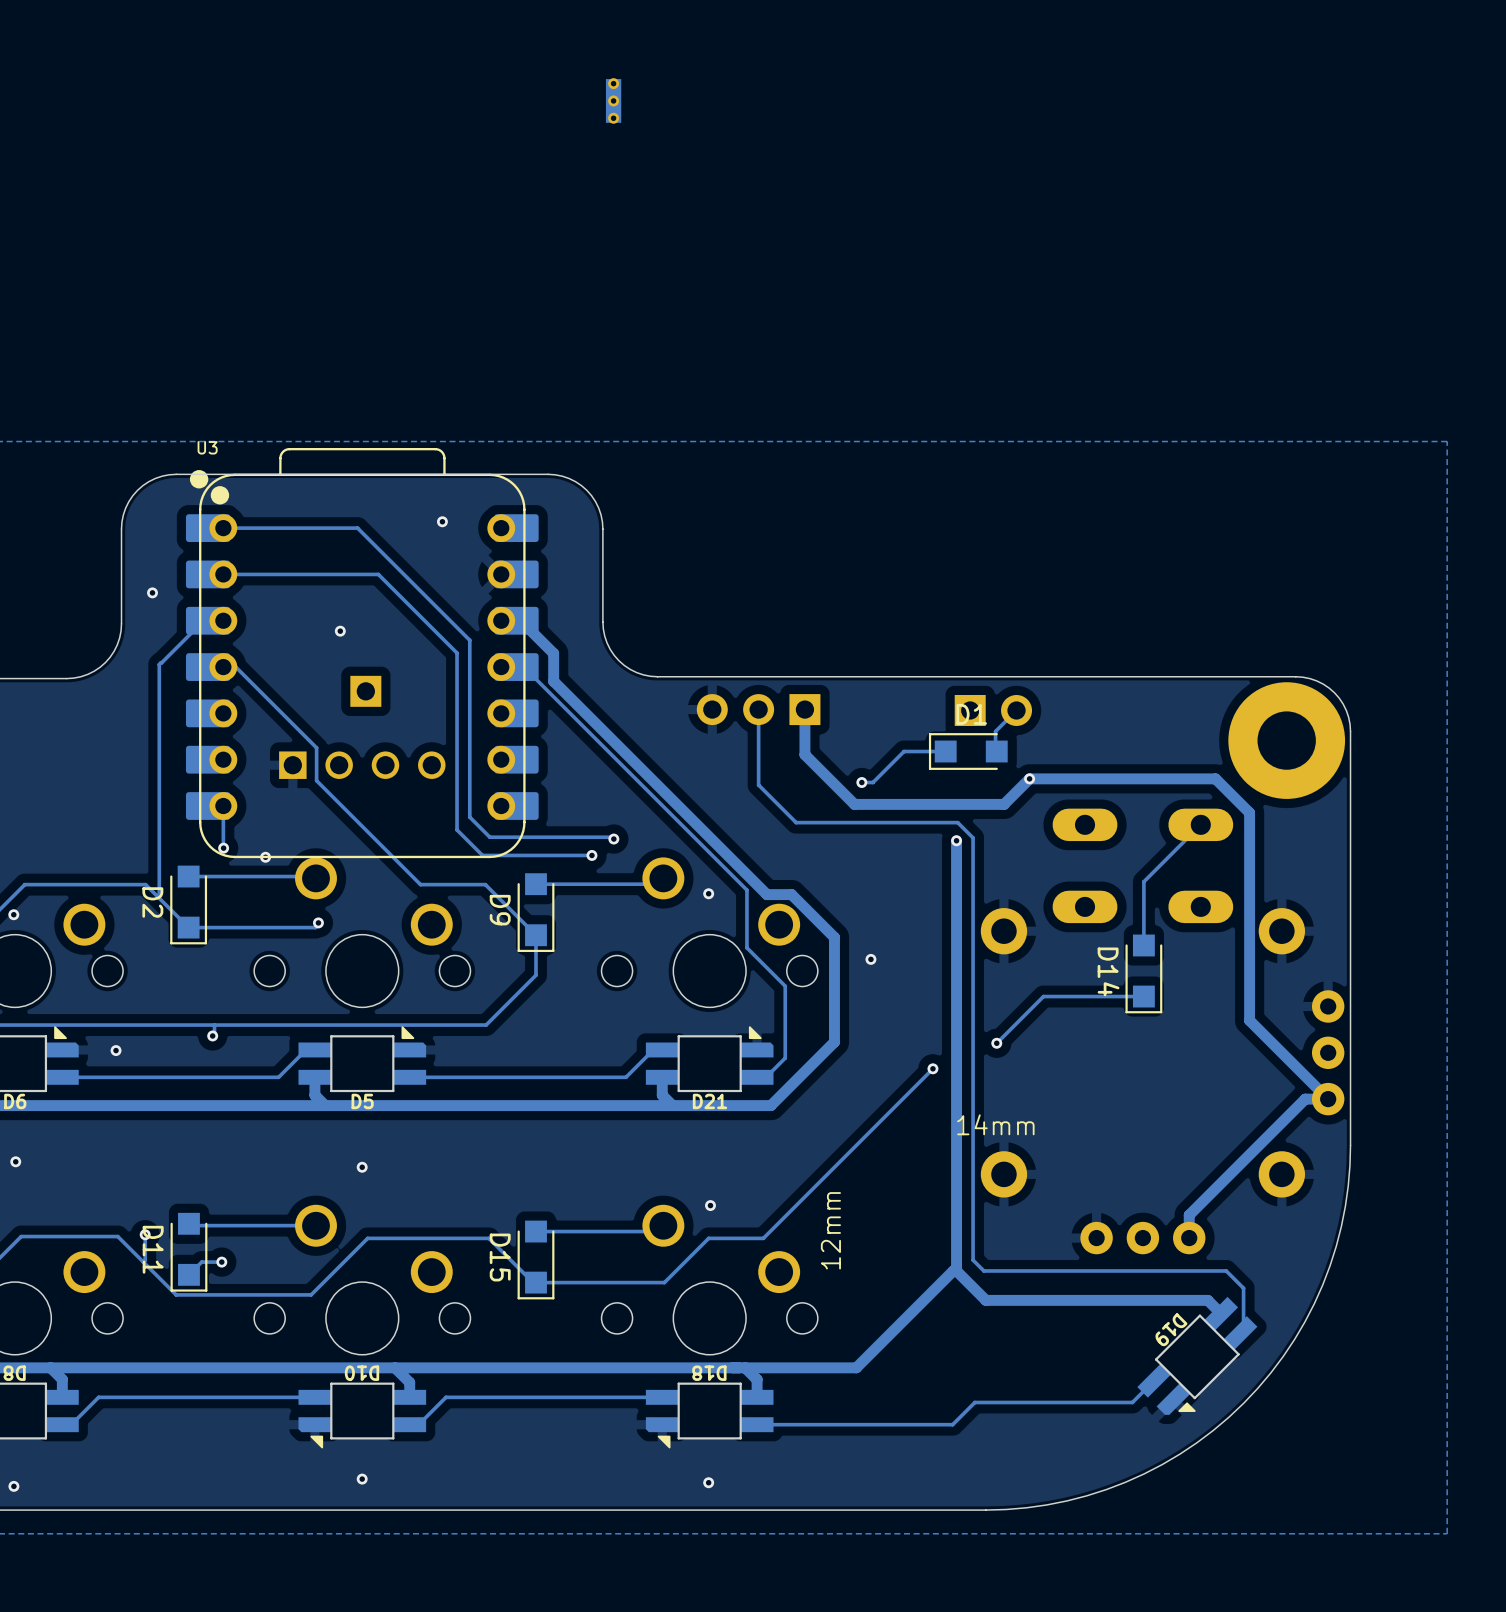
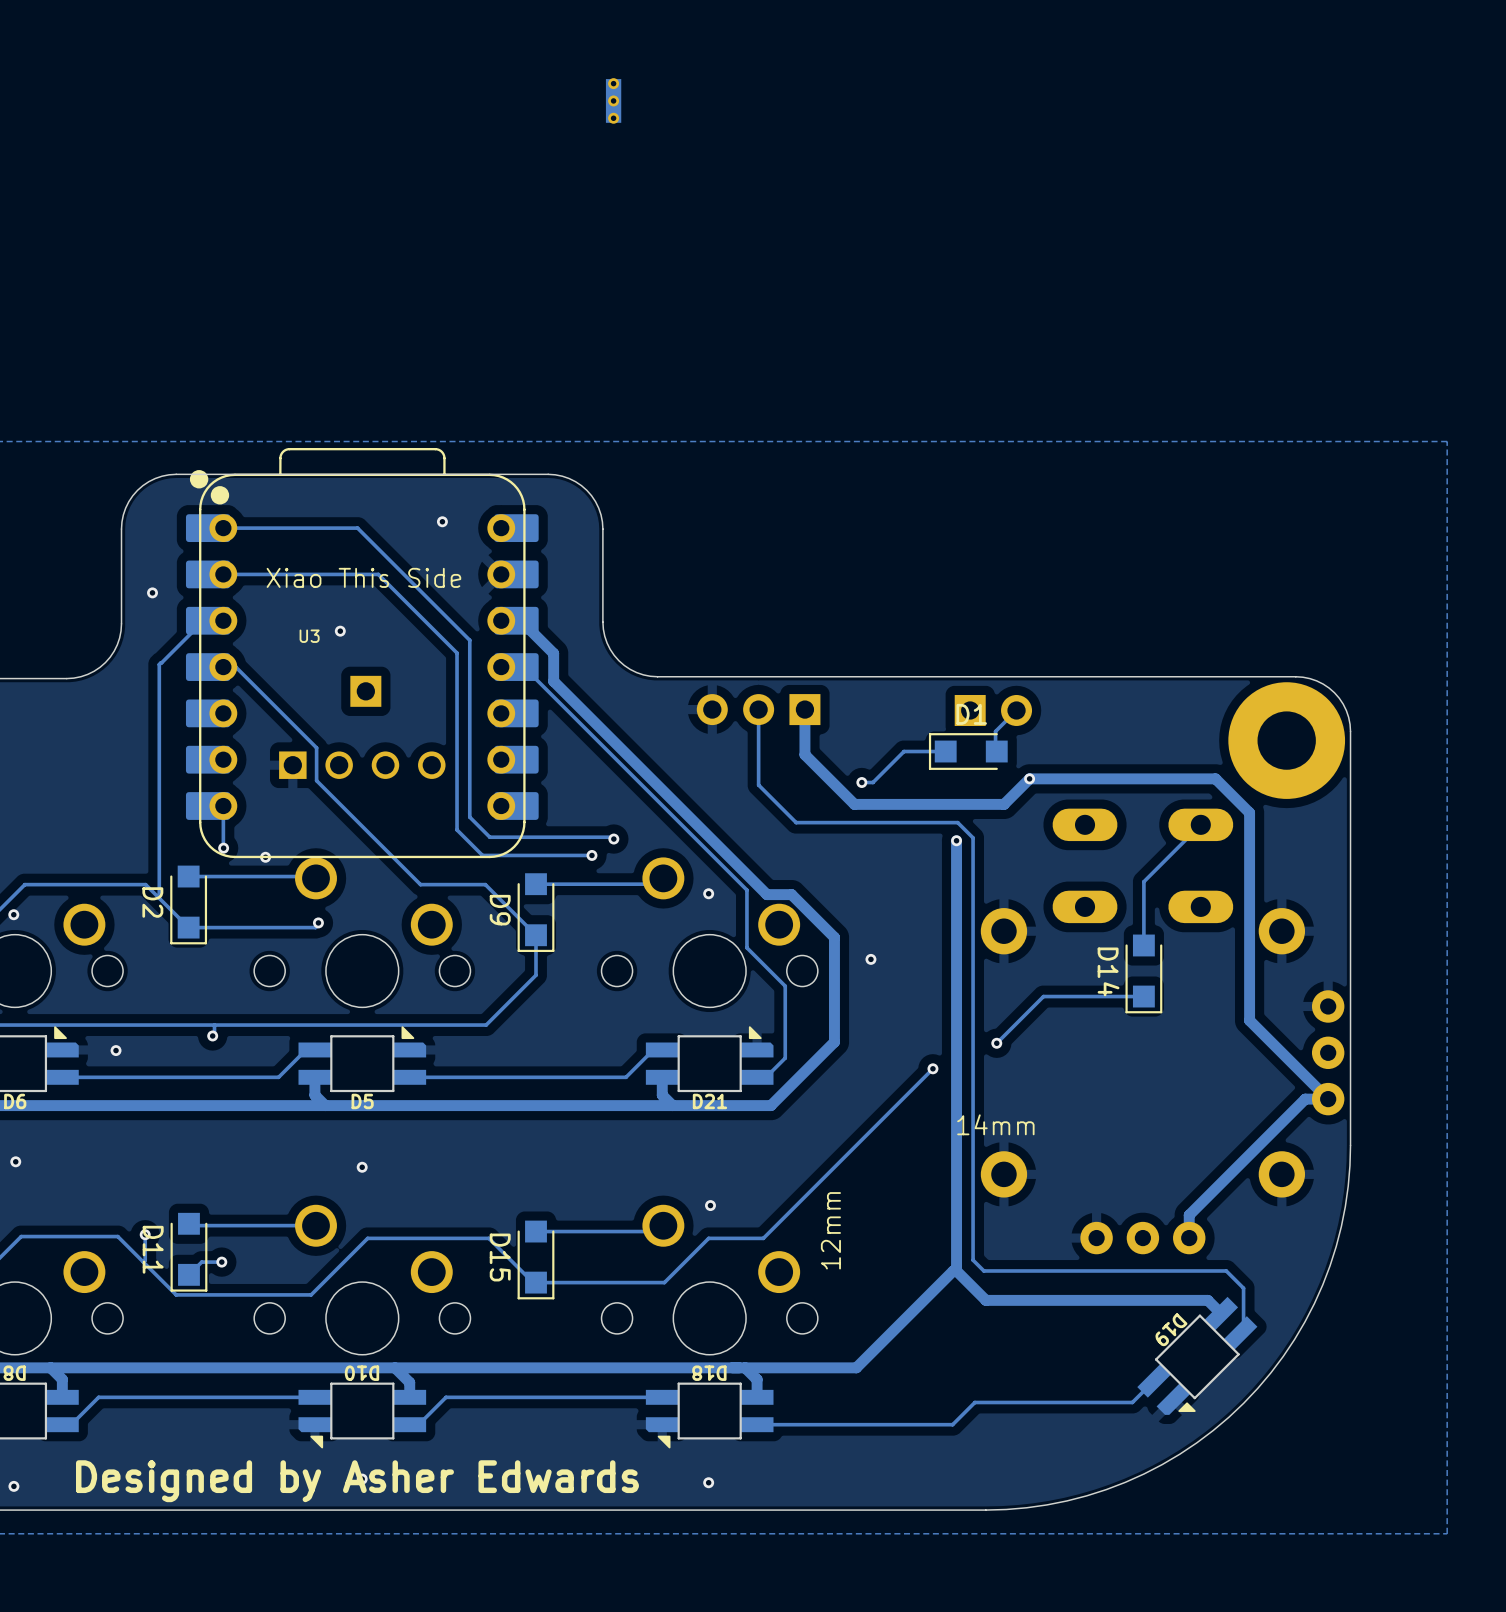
U3 name position: U3 (207, 447) -> U3 (309, 636)
text: none -> Xiao This Side (363, 577)
text: none -> Designed by Asher Edwards (357, 1481)

